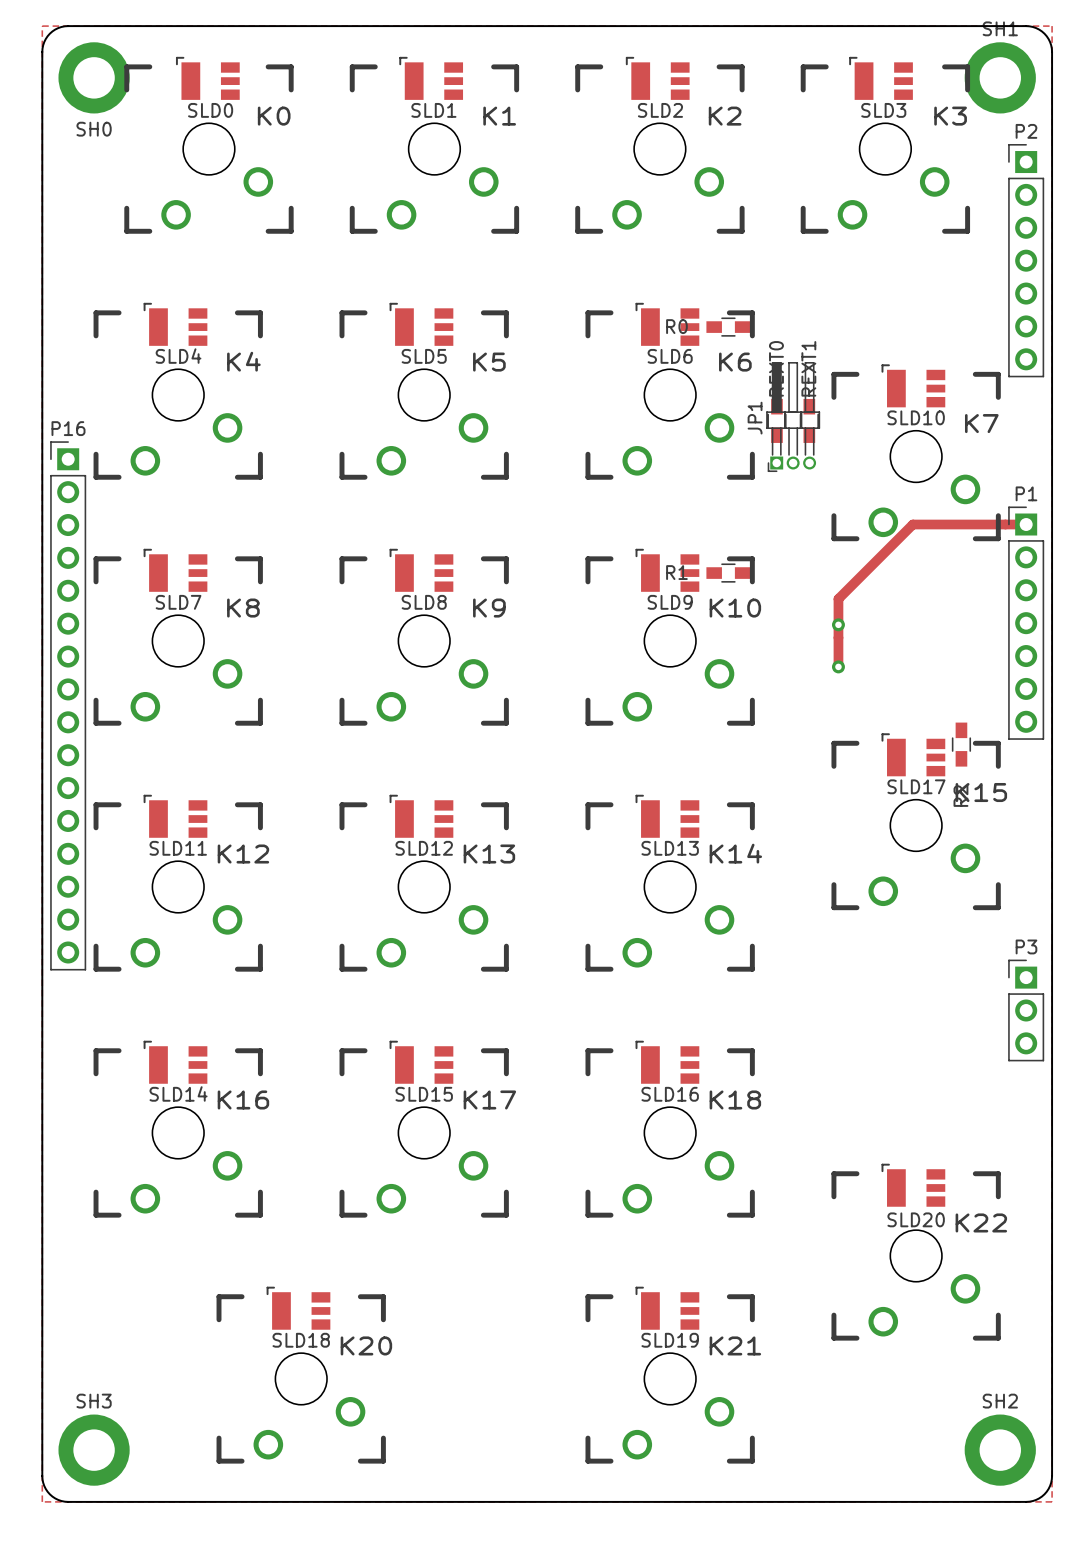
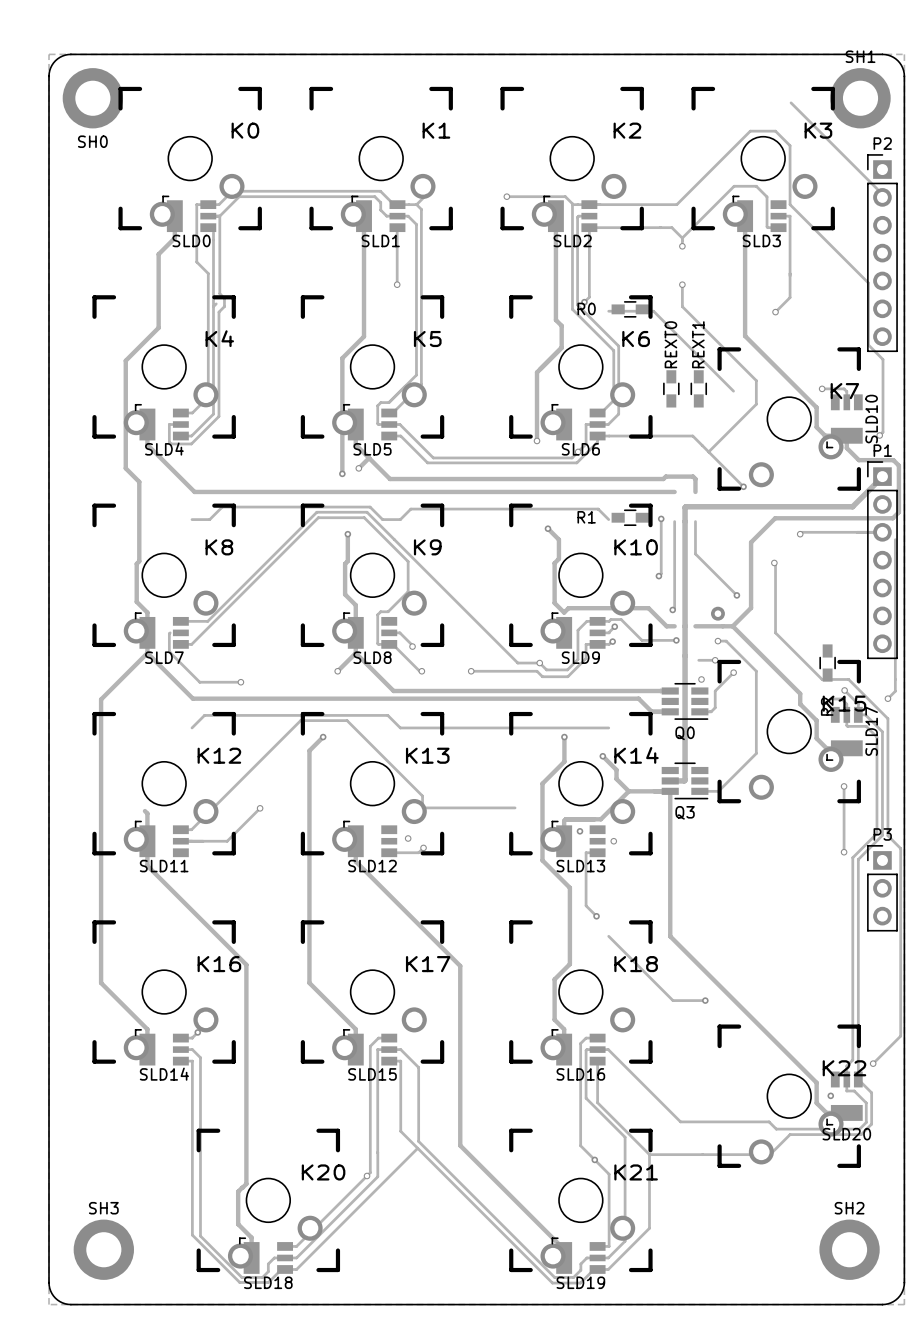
SLD0 position: (207, 78) -> (189, 213)
SLD1 position: (431, 78) -> (378, 213)
SLD2 position: (657, 78) -> (570, 213)
SLD3 position: (881, 78) -> (759, 213)
track: none -> (791, 102) (882, 194) (882, 197)
track: none -> (424, 196) (416, 204)
track: none -> (506, 196) (565, 196) (572, 203) (572, 309) (613, 350) (613, 400) (601, 413) (597, 413)
via: none -> (506, 196)
track: none -> (416, 204) (393, 204) (380, 191) (232, 191) (218, 204) (196, 204) (196, 262) (208, 273) (208, 397) (192, 413) (180, 413)
track: none -> (416, 204) (421, 209) (421, 384) (392, 413) (389, 413)
track: none -> (572, 204) (676, 204) (750, 131) (775, 131) (790, 145) (790, 204) (868, 283) (868, 345) (883, 359) (883, 432) (879, 435)
track: none -> (174, 216) (174, 238) (158, 254) (158, 327) (125, 360) (125, 468) (139, 481) (139, 561) (136, 563) (136, 601) (147, 612) (147, 653)
track: none -> (208, 216) (219, 216) (239, 196) (374, 196) (380, 202) (380, 210) (386, 216) (408, 216) (416, 224) (416, 375) (388, 402) (380, 402) (377, 405) (377, 423) (399, 424) (433, 457) (572, 457) (586, 443) (586, 424) (608, 424) (618, 414) (618, 346) (577, 304) (577, 217) (589, 216)
track: none -> (218, 216) (219, 293) (224, 298) (224, 306) (218, 312) (218, 416) (191, 443) (171, 443) (169, 442) (169, 424) (180, 424)
track: none -> (364, 216) (364, 336) (342, 358) (342, 473)
track: none -> (555, 216) (555, 320) (561, 325) (561, 347) (537, 372) (537, 440)
track: none -> (745, 216) (745, 336) (816, 407) (816, 427) (824, 435) (846, 435) (846, 448) (858, 460) (893, 460) (898, 465) (898, 512) (892, 518) (775, 518) (751, 542) (751, 607) (732, 626)
track: none -> (778, 216) (790, 216) (790, 297) (775, 312)
track: none -> (397, 227) (397, 284)
track: none -> (778, 227) (767, 226) (767, 196) (756, 186) (734, 186) (682, 238) (682, 246)
track: none -> (213, 232) (213, 414) (191, 436) (180, 436)
track: none -> (682, 238) (671, 227) (589, 227) (589, 297) (584, 302)
via: none -> (682, 246)
via: none -> (397, 284)
track: none -> (682, 284) (682, 306) (756, 380) (756, 404) (708, 451)
via: none -> (682, 284)
via: none -> (584, 302)
track: none -> (216, 303) (213, 306)
SLD4 position: (175, 324) -> (161, 422)
SLD5 position: (421, 324) -> (370, 422)
SLD6 position: (667, 324) -> (578, 422)
track: none -> (608, 311) (653, 311) (733, 391)
via: none -> (775, 312)
SLD10 rotation: 0° (913, 385) -> 90° counterclockwise (844, 421)
SLD10 position: (913, 385) -> (844, 421)
JP1: (793, 417) -> none
track: none -> (822, 388) (844, 388) (846, 391) (846, 402)
via: none -> (822, 388)
track: none -> (147, 424) (147, 444) (194, 491) (674, 491)
track: none -> (355, 424) (355, 444) (390, 479) (663, 479) (665, 476) (693, 476) (695, 479) (695, 491)
via: none -> (879, 435)
track: none -> (389, 436) (400, 436) (427, 462) (576, 462) (597, 442) (597, 436) (692, 436) (743, 486)
via: none -> (537, 440)
via: none -> (578, 451)
track: none -> (369, 458) (358, 468)
via: none -> (358, 468)
via: none -> (342, 473)
track: (1026, 524) (912, 524) (838, 598) (838, 666) -> (882, 476) (852, 506) (685, 507) (685, 780) (670, 780)
via: none -> (743, 486)
SLD7 position: (175, 570) -> (161, 630)
SLD8 position: (421, 570) -> (370, 630)
SLD9 position: (667, 570) -> (578, 630)
track: none -> (661, 518) (661, 573) (658, 576)
via: none -> (661, 518)
track: none -> (192, 519) (209, 519) (222, 507) (370, 507) (382, 519) (400, 519) (410, 509) (598, 509) (608, 519)
track: none -> (674, 521) (674, 608) (672, 609)
track: none -> (695, 521) (695, 553) (736, 595)
track: none -> (547, 528) (558, 539) (558, 558) (554, 563) (554, 603) (564, 612) (568, 608) (648, 608) (666, 626) (674, 626)
via: none -> (547, 528)
track: none -> (882, 532) (802, 532) (800, 534)
track: none -> (347, 534) (345, 594) (355, 605) (355, 653)
via: none -> (347, 534)
via: none -> (800, 534)
track: none -> (895, 539) (895, 691) (887, 698)
via: (838, 624) -> none
track: none -> (774, 562) (775, 632) (822, 679) (848, 679) (887, 718) (887, 835) (900, 848) (900, 1036) (873, 1063)
via: none -> (774, 562)
via: none -> (658, 576)
via: none -> (736, 595)
via: (838, 666) -> none
via: none -> (672, 609)
part: none -> (717, 613)
track: none -> (180, 621) (207, 621) (316, 512) (367, 512) (517, 663) (539, 663) (546, 669) (567, 669) (577, 659) (577, 630) (586, 621) (621, 619) (642, 640) (676, 640)
track: none -> (614, 626) (609, 632) (597, 632)
via: none -> (614, 626)
track: none -> (695, 626) (732, 626)
track: none -> (732, 626) (800, 693) (800, 704) (816, 720) (816, 738) (826, 748) (846, 748)
P16: (68, 705) -> none
track: none -> (170, 632) (170, 652)
track: none -> (389, 632) (399, 632) (412, 646)
via: none -> (676, 640)
track: none -> (717, 641) (726, 641) (756, 671) (756, 753) (718, 791) (699, 791)
via: none -> (717, 641)
track: none -> (612, 641) (609, 644) (586, 644) (586, 658) (567, 676) (542, 676) (537, 671) (471, 671)
via: none -> (612, 641)
track: none -> (180, 644) (191, 644) (318, 517) (364, 517) (408, 561) (408, 591) (388, 611) (380, 611) (377, 614) (377, 643) (392, 644) (421, 671)
via: none -> (412, 646)
track: none -> (147, 653) (101, 699) (101, 982) (147, 1029) (147, 1049)
track: none -> (147, 653) (192, 698) (638, 698) (651, 711) (670, 711)
track: none -> (170, 652) (199, 682) (240, 682)
track: none -> (355, 653) (337, 671)
track: none -> (355, 653) (393, 691) (670, 691)
track: none -> (698, 660) (715, 660)
via: none -> (715, 660)
via: none -> (539, 663)
via: none -> (337, 671)
via: none -> (421, 671)
via: none -> (471, 671)
SLD17 rotation: 0° (913, 754) -> 90° counterclockwise (844, 733)
SLD17 position: (913, 754) -> (844, 733)
track: none -> (733, 672) (715, 691) (715, 707) (711, 711) (699, 711)
via: none -> (733, 672)
via: none -> (701, 679)
via: none -> (240, 682)
track: none -> (844, 690) (858, 704) (858, 714) (865, 714) (882, 731) (882, 835) (858, 859) (858, 1079) (871, 1092) (871, 1124) (861, 1134) (790, 1134) (770, 1154) (649, 1154)
via: none -> (844, 690)
via: none -> (887, 698)
track: none -> (832, 698) (841, 698) (846, 704) (847, 726) (866, 726) (876, 737) (876, 833) (852, 857) (852, 1060) (846, 1066) (846, 1091) (854, 1091) (866, 1102) (866, 1122) (859, 1129) (776, 1129) (769, 1121) (680, 1121) (608, 1049) (586, 1049) (586, 1098) (625, 1137) (625, 1241) (608, 1257) (586, 1257) (580, 1264) (580, 1270) (573, 1277) (554, 1277) (418, 1141) (418, 1067) (400, 1049) (377, 1049) (377, 1152)
Q0: none -> (685, 701)
SLD11 position: (175, 816) -> (161, 838)
SLD12 position: (421, 816) -> (370, 838)
SLD13 position: (667, 816) -> (578, 838)
track: none -> (192, 727) (204, 715) (387, 715) (400, 727) (608, 727)
track: none -> (323, 737) (309, 750) (309, 982) (355, 1029) (355, 1049)
via: none -> (323, 737)
track: none -> (564, 737) (564, 761) (542, 783) (542, 860) (569, 887) (569, 964) (554, 979) (554, 1019) (564, 1029) (564, 1049)
via: none -> (564, 737)
track: none -> (602, 756) (616, 769) (616, 779) (628, 791)
via: none -> (602, 756)
Q3: none -> (685, 780)
track: none -> (844, 786) (844, 852)
via: none -> (844, 786)
track: none -> (628, 791) (670, 791) (670, 936) (816, 1082) (816, 1103) (826, 1112) (846, 1112)
track: none -> (628, 791) (600, 819) (565, 819) (564, 820) (564, 841)
track: none -> (515, 807) (422, 807) (422, 796) (347, 720) (300, 720) (191, 829) (180, 829)
track: none -> (260, 808) (227, 841) (180, 841)
via: none -> (260, 808)
track: none -> (144, 811) (147, 813) (147, 865) (246, 964) (246, 1183) (238, 1191) (238, 1224) (251, 1237) (251, 1257)
via: none -> (579, 831)
track: none -> (355, 833) (355, 861) (460, 965) (460, 1145) (564, 1249) (564, 1257)
via: none -> (408, 838)
via: none -> (613, 841)
track: none -> (423, 847) (418, 852) (389, 852)
via: none -> (423, 847)
via: none -> (844, 852)
track: none -> (597, 852) (586, 852) (586, 905) (596, 916)
via: none -> (596, 916)
SLD14 position: (175, 1062) -> (161, 1047)
SLD15 position: (421, 1062) -> (370, 1047)
SLD16 position: (667, 1062) -> (578, 1047)
track: none -> (608, 936) (673, 1000) (705, 1000)
via: none -> (705, 1000)
track: none -> (197, 1032) (192, 1038) (180, 1038)
via: none -> (197, 1032)
SLD20 rotation: 0° (913, 1185) -> 90° counterclockwise (844, 1098)
SLD20 position: (913, 1185) -> (844, 1098)
track: none -> (389, 1038) (378, 1038) (370, 1046) (370, 1172) (296, 1246) (285, 1246)
track: none -> (597, 1038) (586, 1038) (580, 1043) (580, 1145) (609, 1174) (609, 1246) (597, 1246)
track: none -> (180, 1049) (192, 1049) (200, 1057) (200, 1236) (241, 1277) (262, 1277) (268, 1271) (268, 1264) (274, 1257) (296, 1257) (377, 1176) (377, 1152)
track: none -> (180, 1061) (192, 1061) (192, 1235) (239, 1282) (268, 1282) (281, 1269) (296, 1269) (417, 1148)
track: none -> (389, 1061) (400, 1061) (400, 1131) (552, 1283) (580, 1283) (594, 1269) (608, 1269) (649, 1228) (649, 1154)
track: none -> (597, 1061) (597, 1102) (649, 1154)
via: none -> (873, 1063)
via: none -> (830, 1095)
SLD18 position: (298, 1308) -> (266, 1255)
SLD19 position: (667, 1308) -> (578, 1255)
via: none -> (594, 1159)
via: none -> (367, 1175)
SH3 position: (94, 1450) -> (103, 1249)
SH2 position: (1000, 1450) -> (849, 1249)

